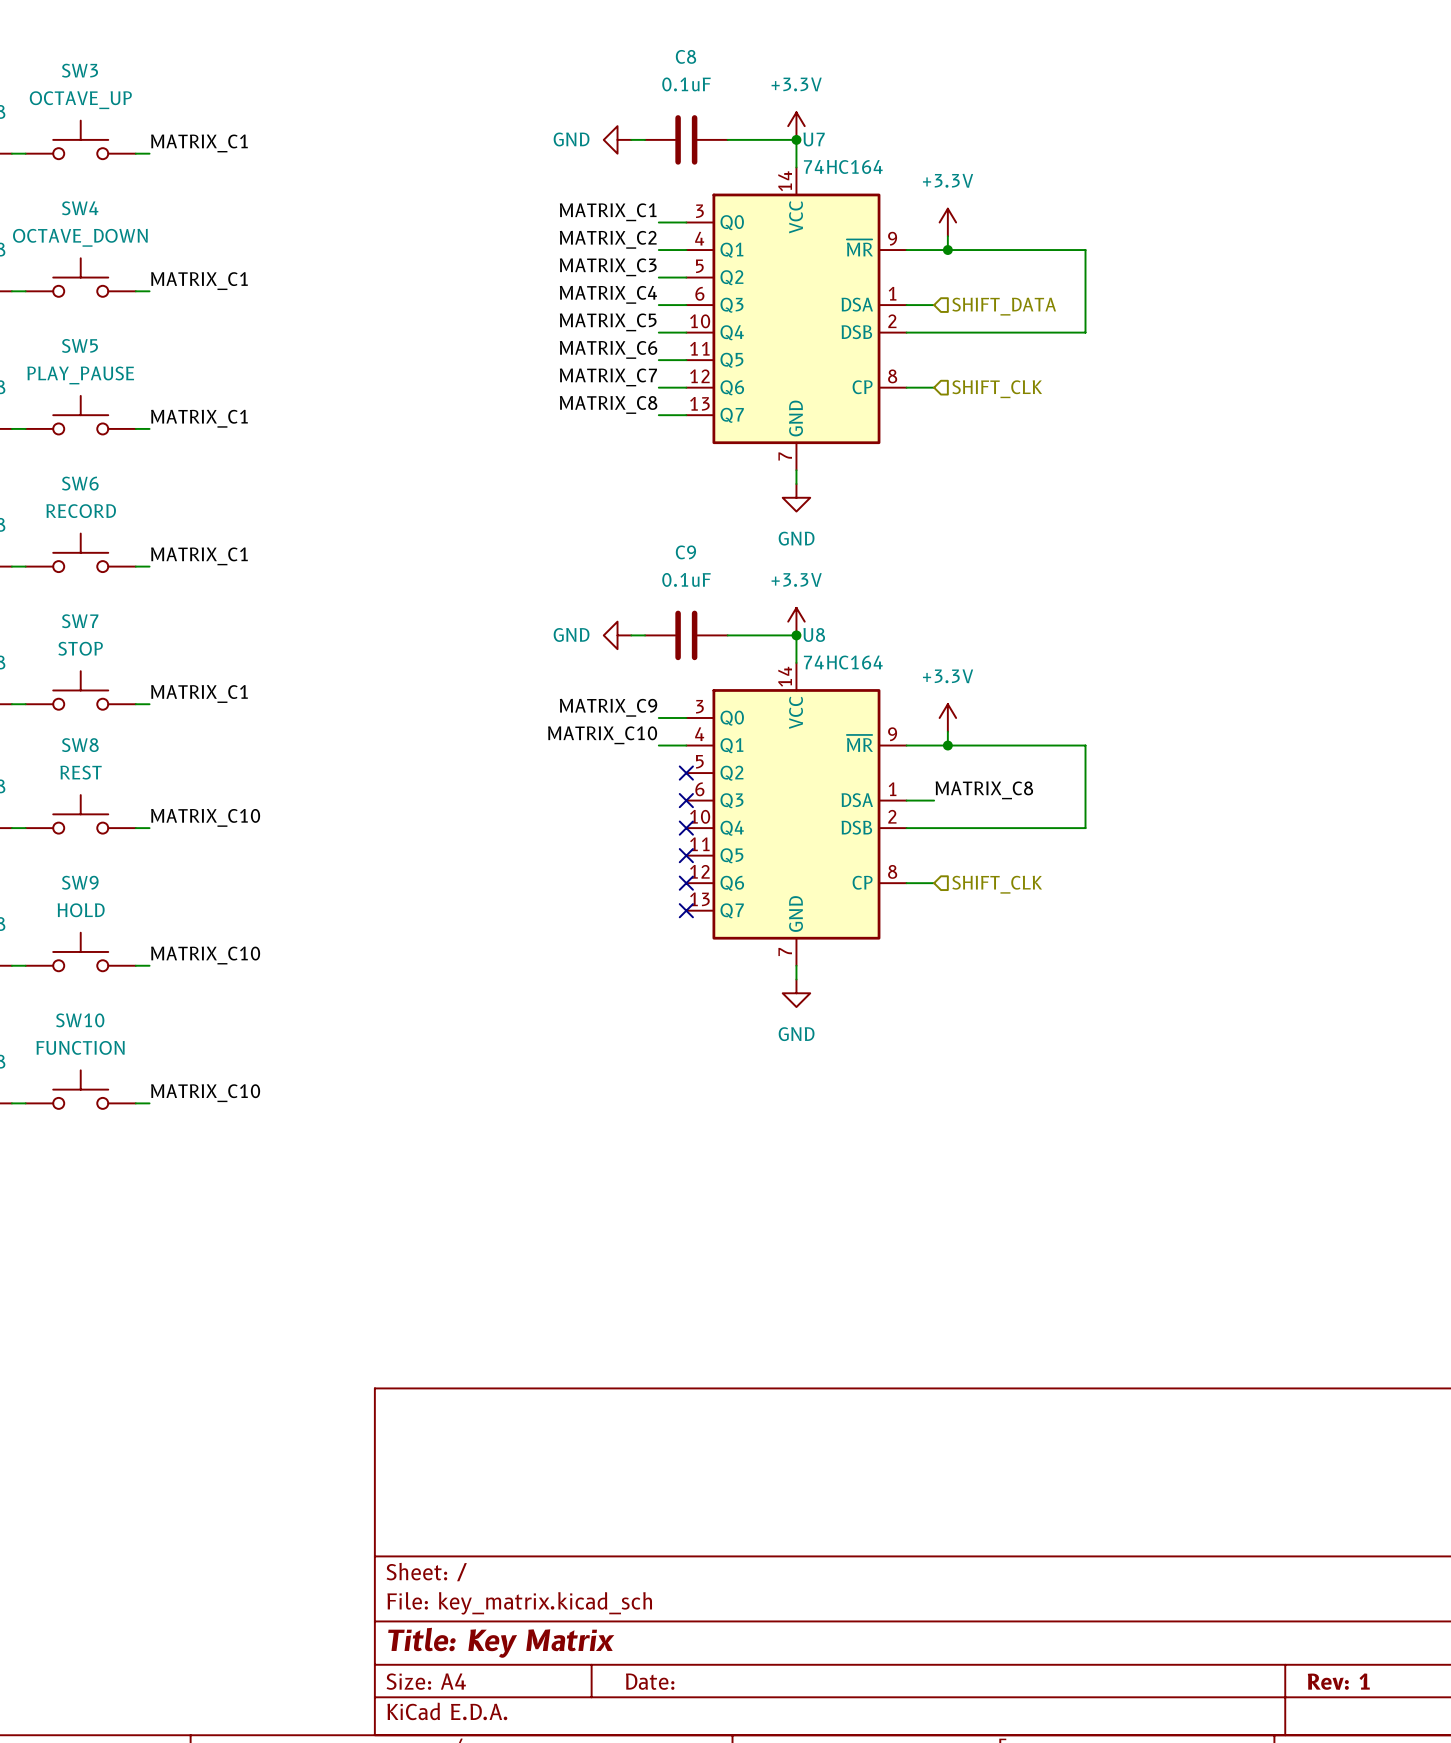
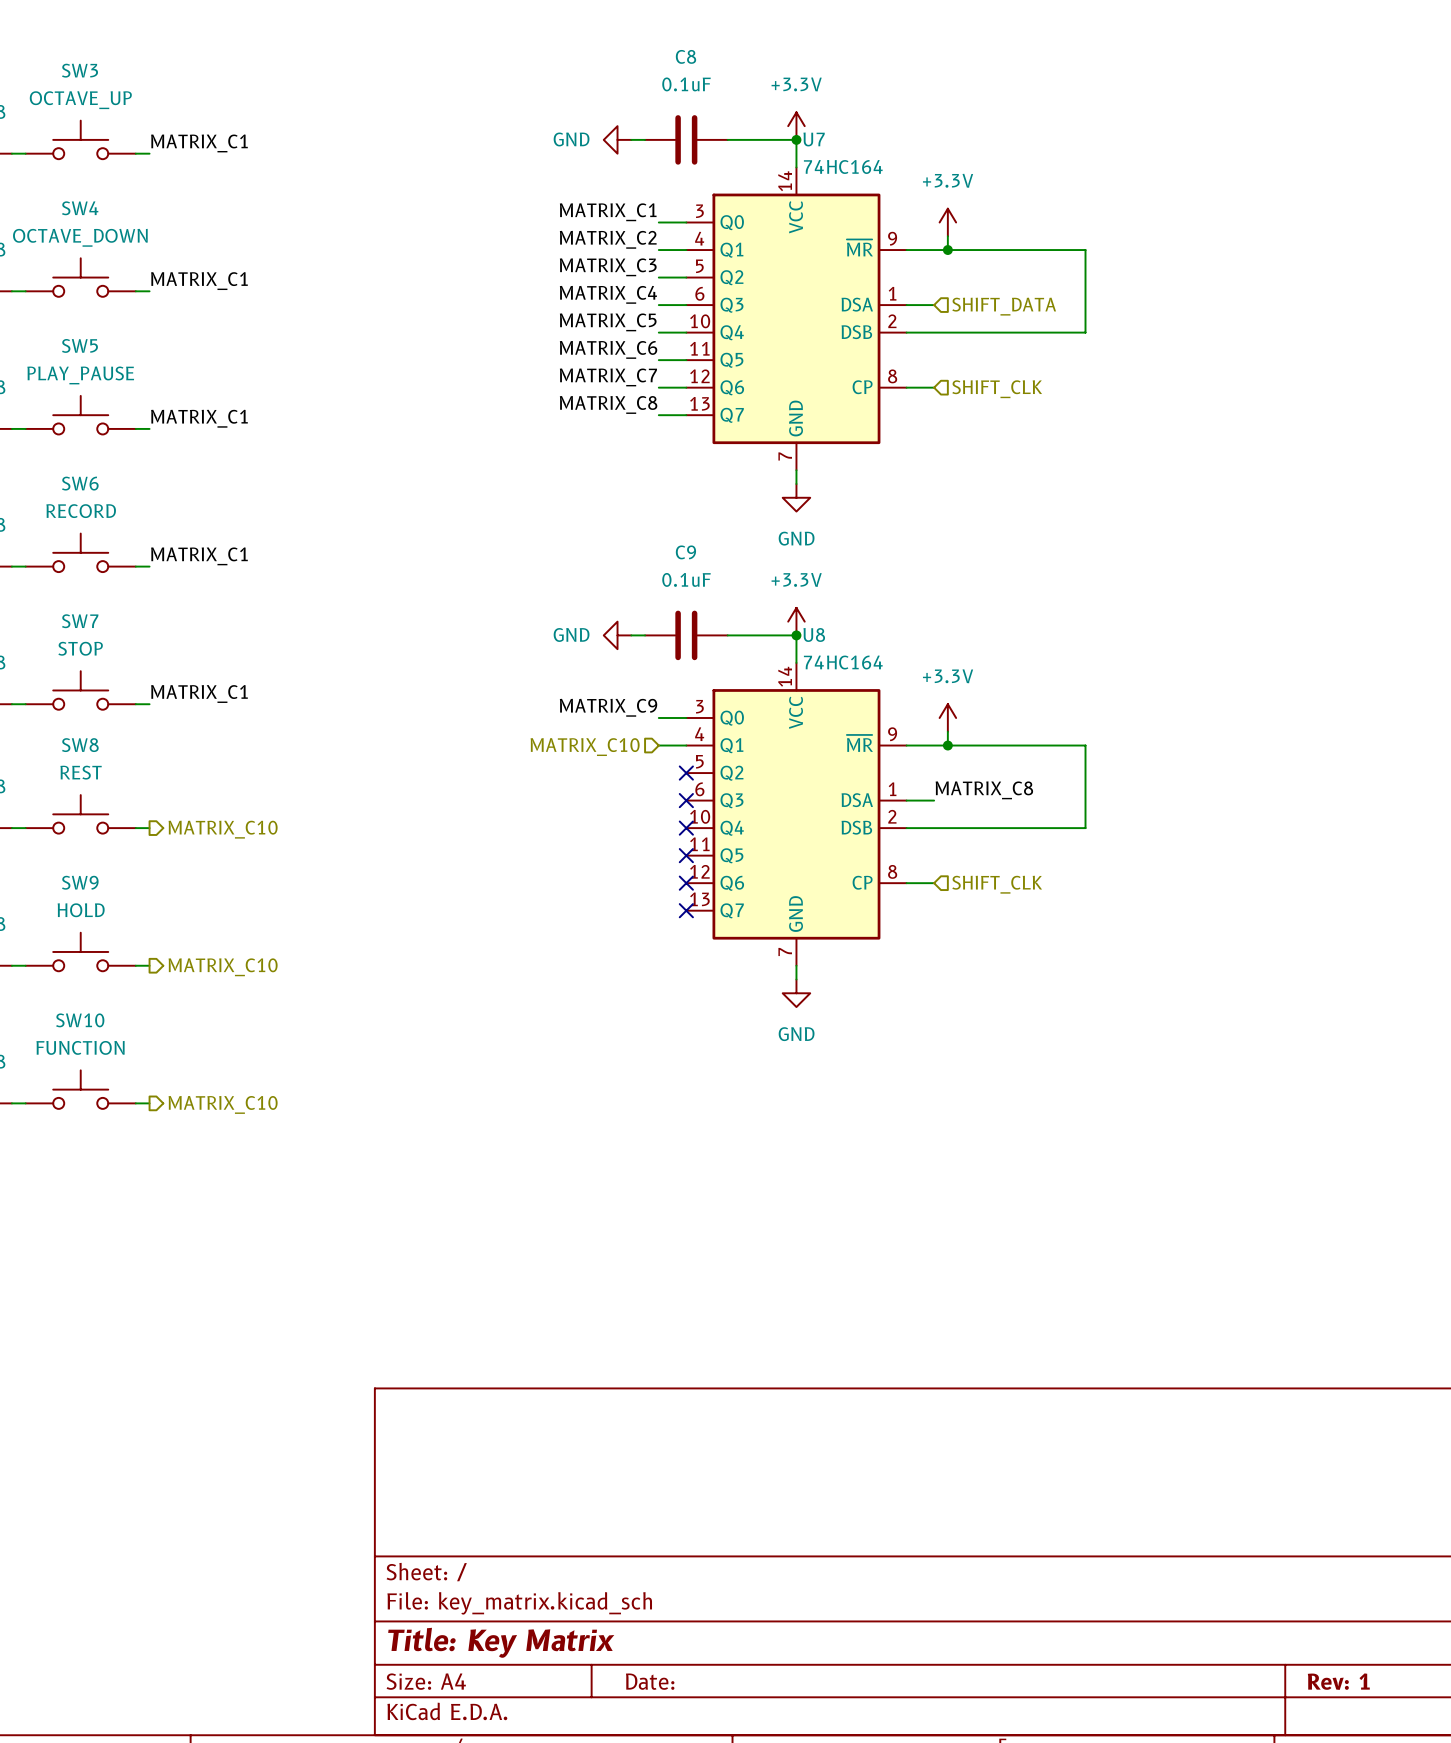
label: MATRIX_C10 (602, 735) -> none
hierarchical label: none -> MATRIX_C10 (585, 747)
label: MATRIX_C10 (205, 817) -> none
hierarchical label: none -> MATRIX_C10 (223, 829)
label: MATRIX_C10 (205, 955) -> none
hierarchical label: none -> MATRIX_C10 (223, 967)
label: MATRIX_C10 (205, 1093) -> none
hierarchical label: none -> MATRIX_C10 (223, 1104)

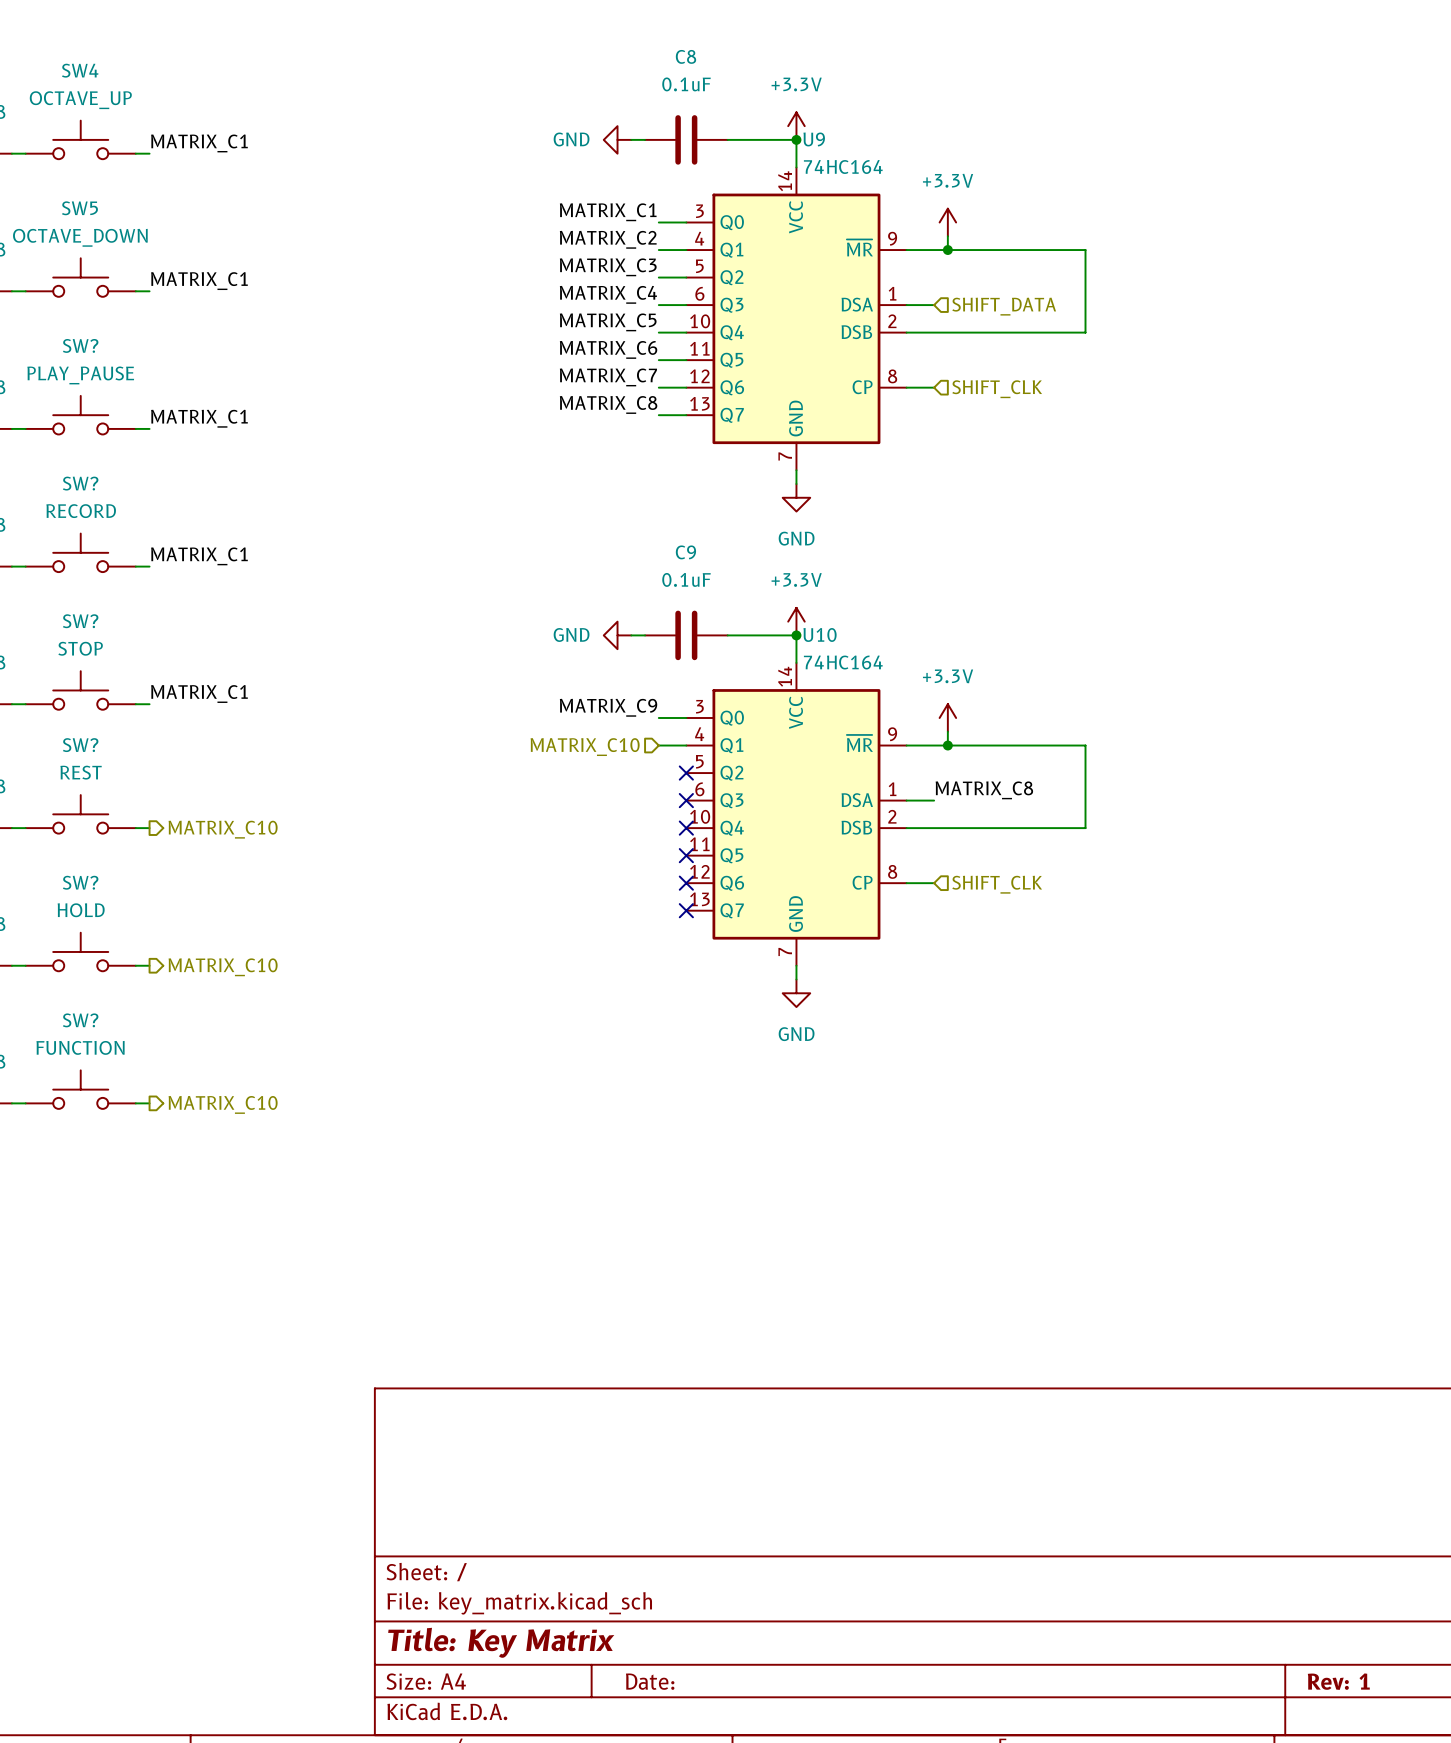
SW3 name: SW3 (80, 70) -> SW4 (80, 70)
U7 name: U7 (814, 139) -> U9 (814, 139)
SW4 name: SW4 (80, 208) -> SW5 (79, 208)
SW5 name: SW5 (79, 345) -> SW? (80, 345)
SW6 name: SW6 (80, 483) -> SW? (80, 483)
SW7 name: SW7 (80, 621) -> SW? (80, 621)
U8 name: U8 (814, 634) -> U10 (820, 634)
SW8 name: SW8 (80, 745) -> SW? (80, 745)
SW9 name: SW9 (80, 882) -> SW? (80, 882)
SW10 name: SW10 (80, 1020) -> SW? (80, 1020)

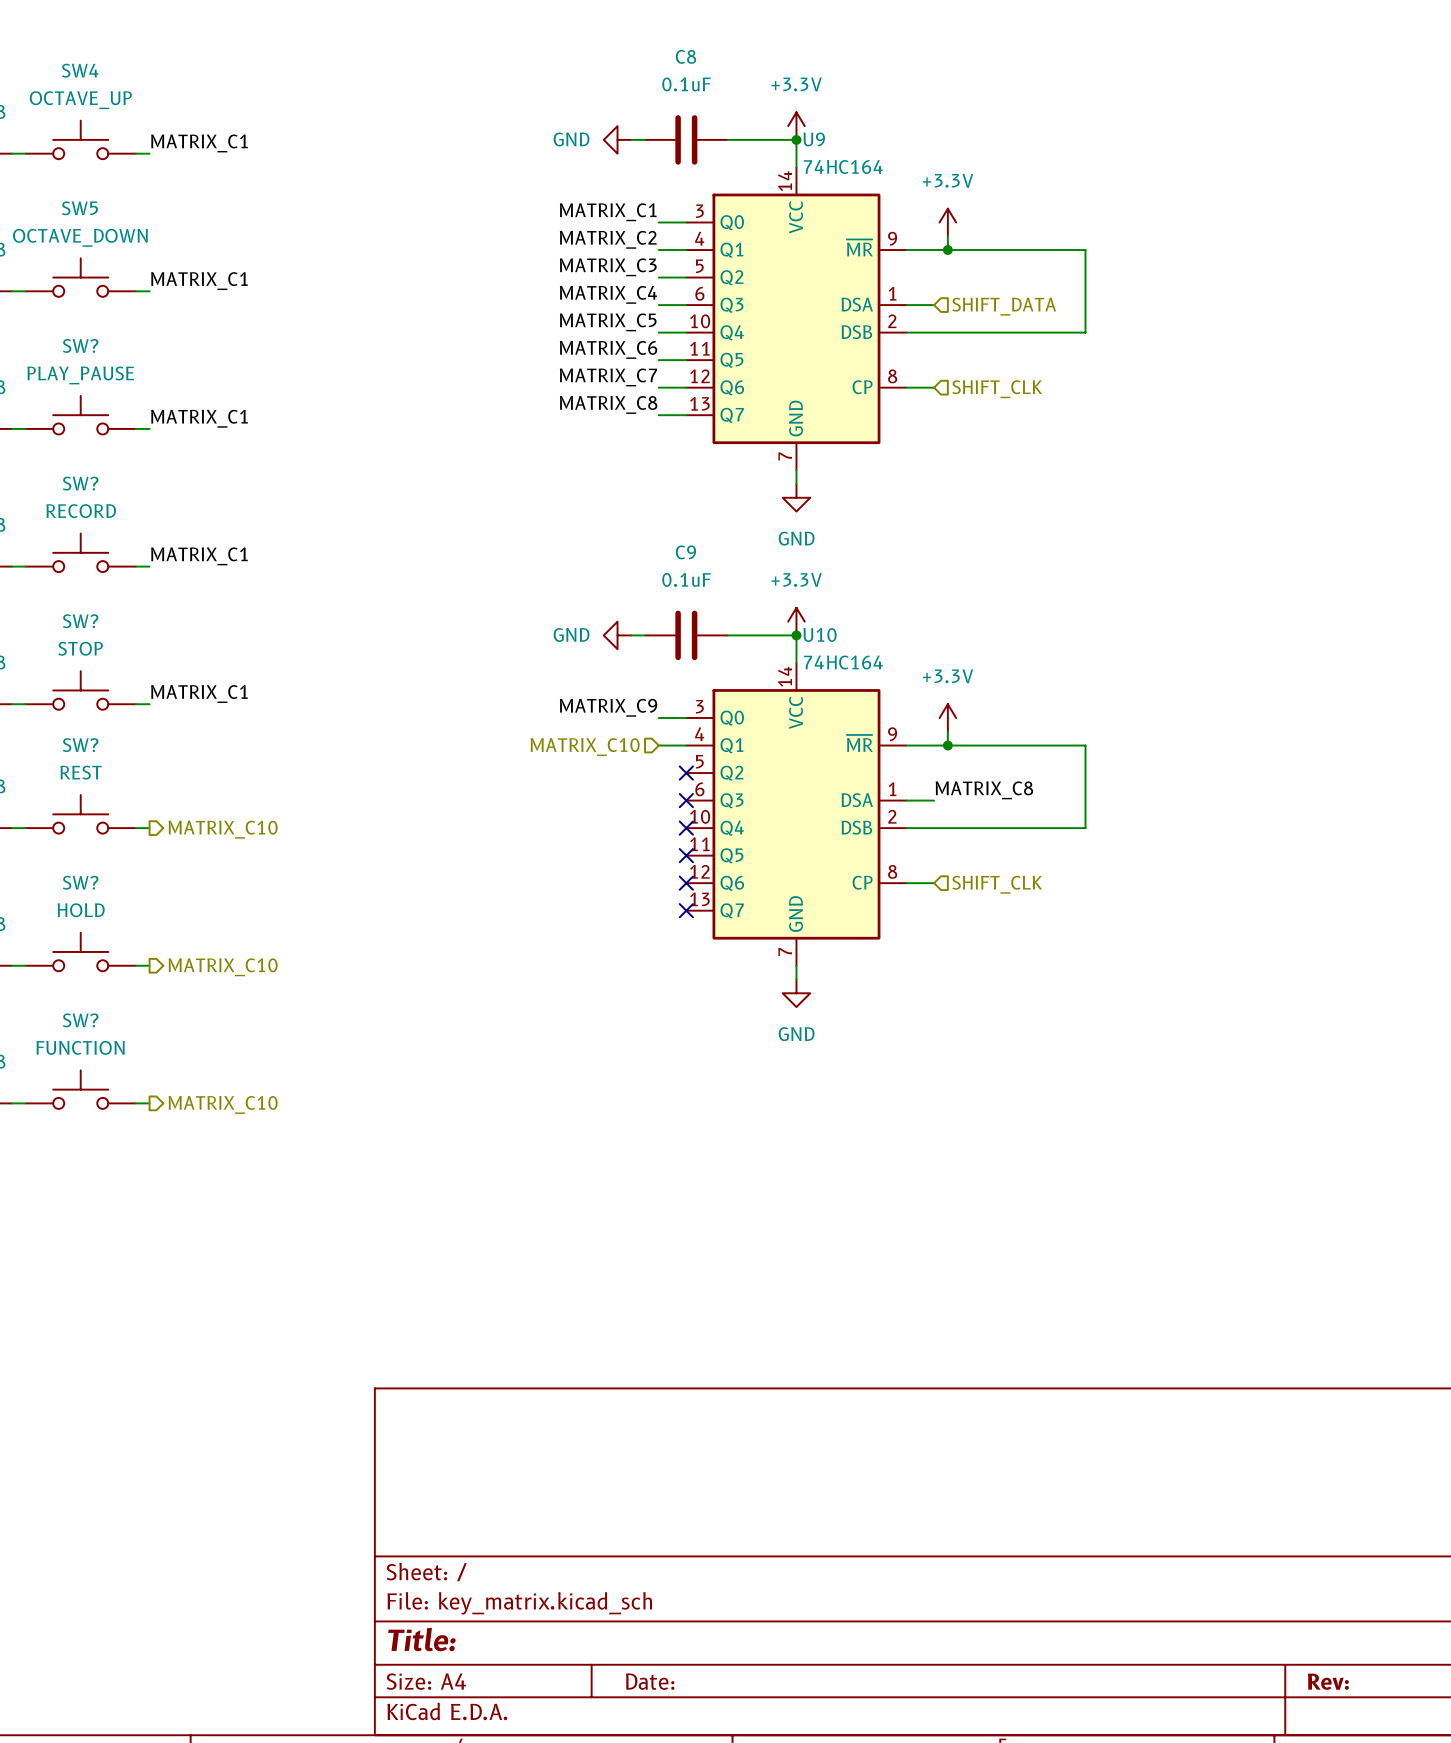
title block: Title: Key Matrix (501, 1642) -> Title: (421, 1639)
title block: Rev: 1 (1338, 1681) -> Rev: (1328, 1681)

